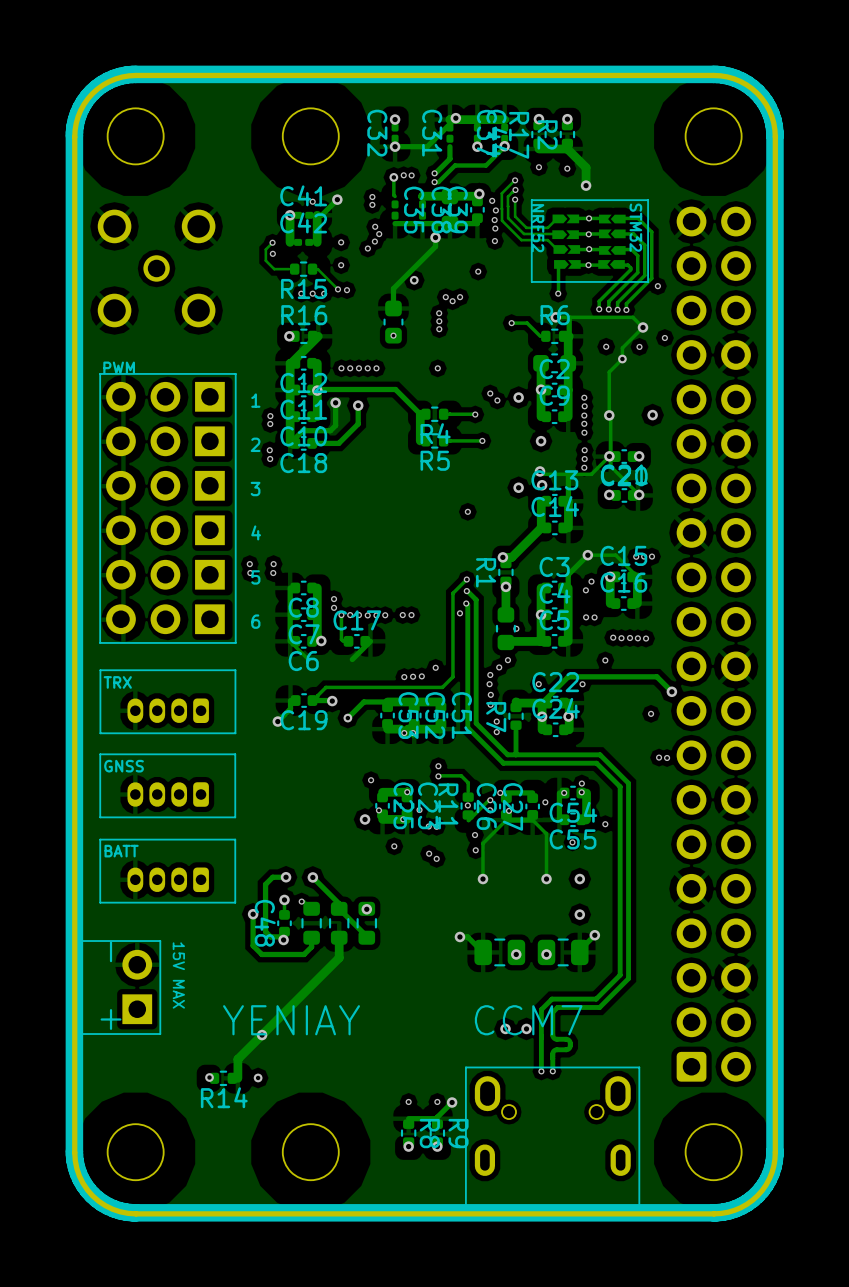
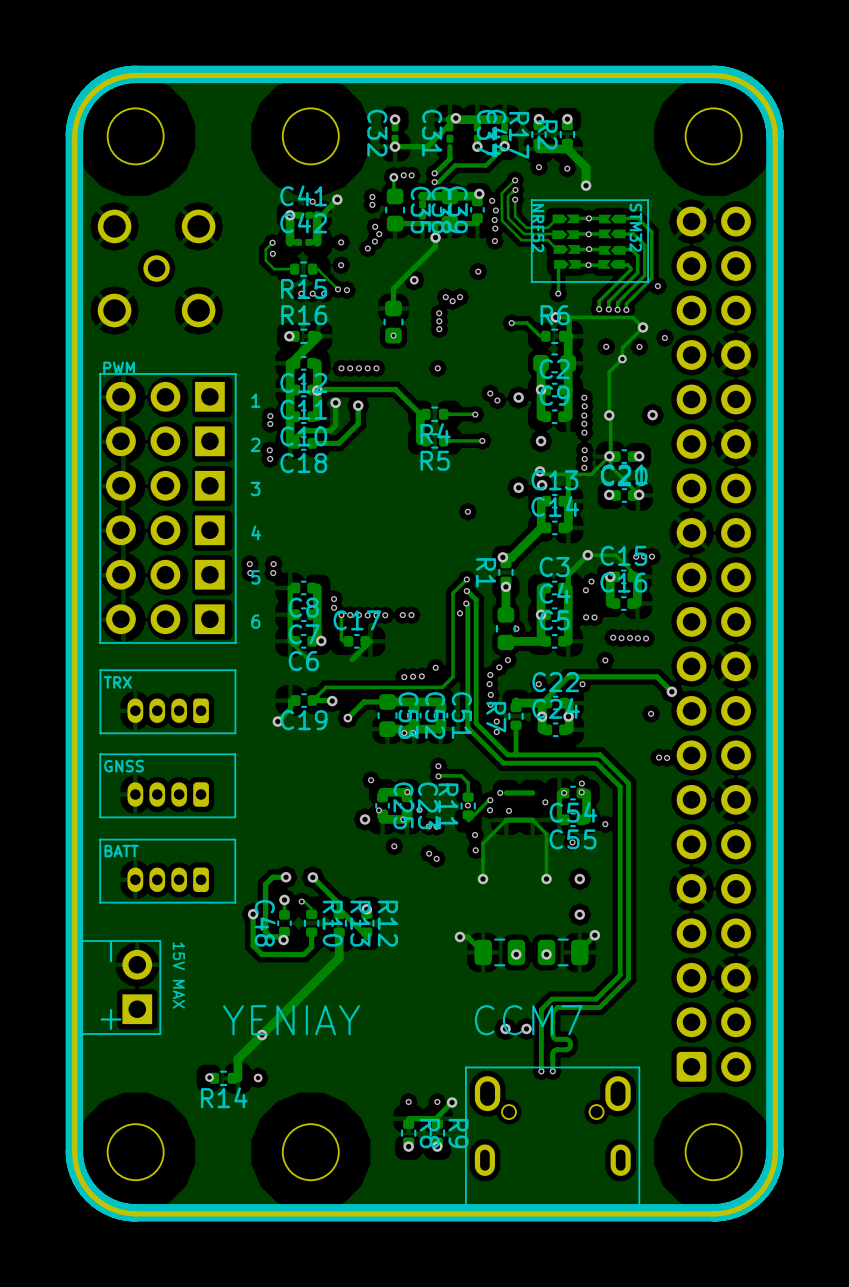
C35 footprint: [391, 200, 399, 220] -> [385, 188, 406, 232]
C53 footprint: [380, 702, 395, 729] -> [377, 694, 398, 738]
C26: (506, 806) -> none
C27: (532, 806) -> none
part: (311, 923) -> none
R10: none -> (311, 923)
part: (339, 923) -> none
R13: none -> (339, 923)
part: (366, 923) -> none
R12: none -> (366, 923)

